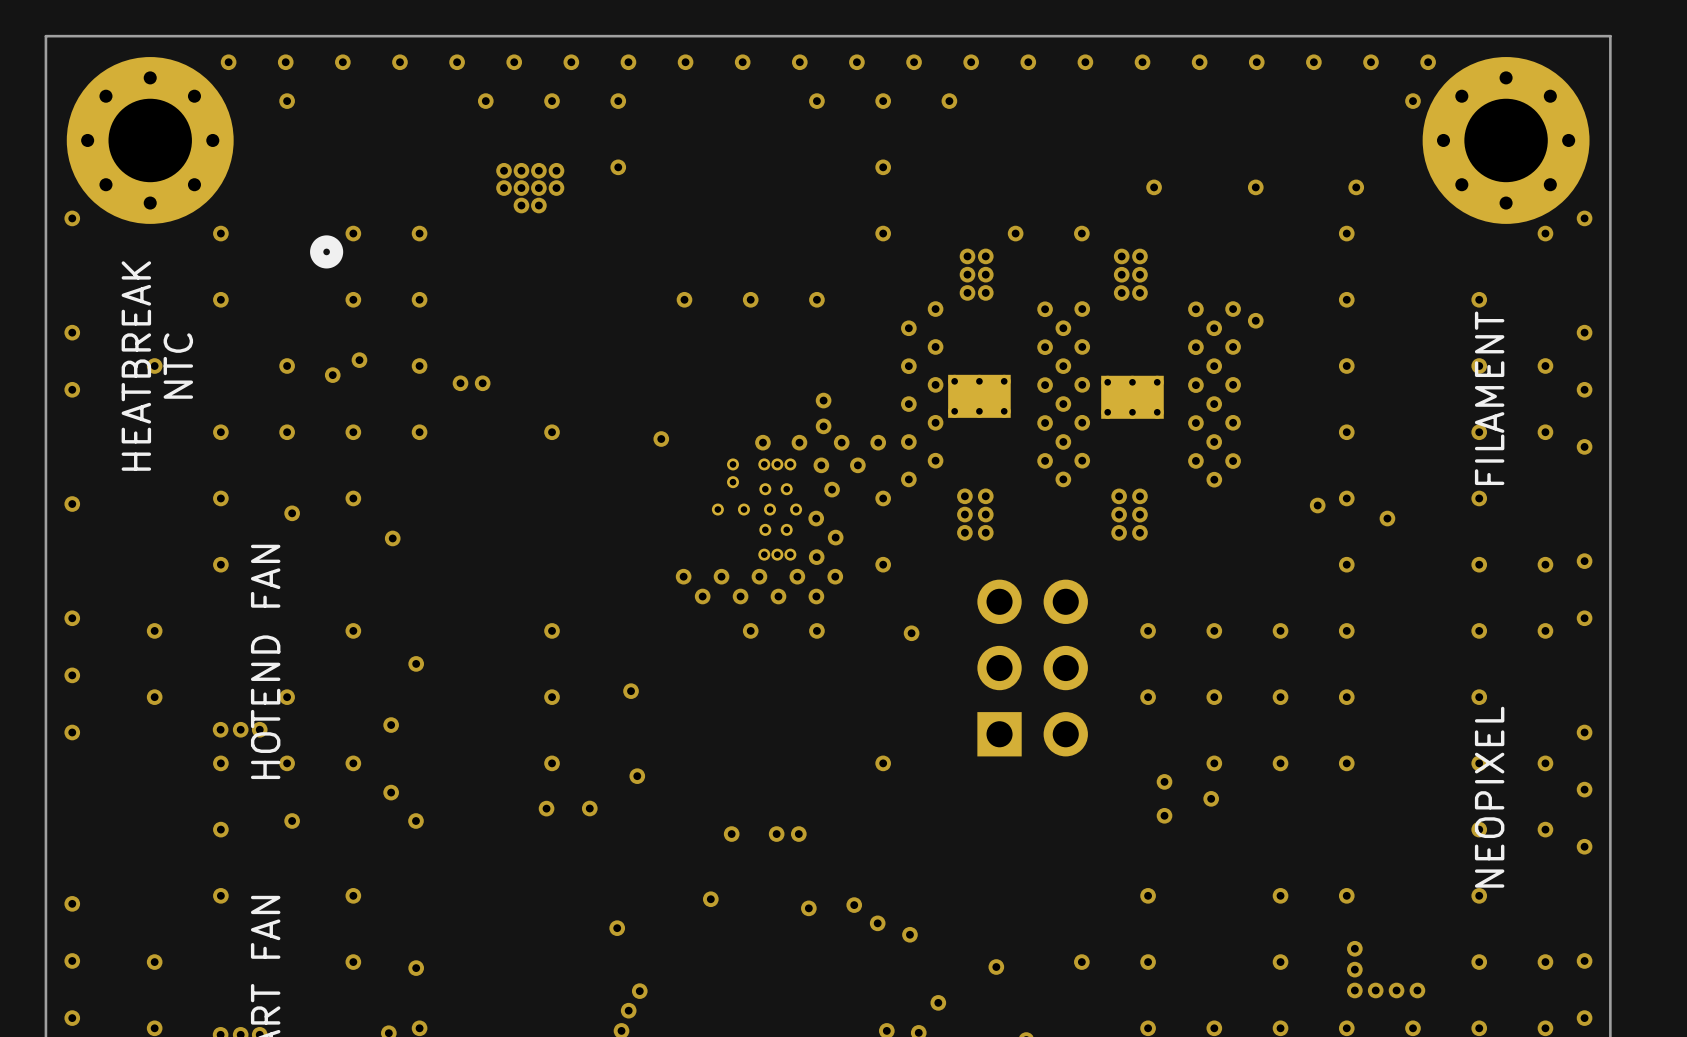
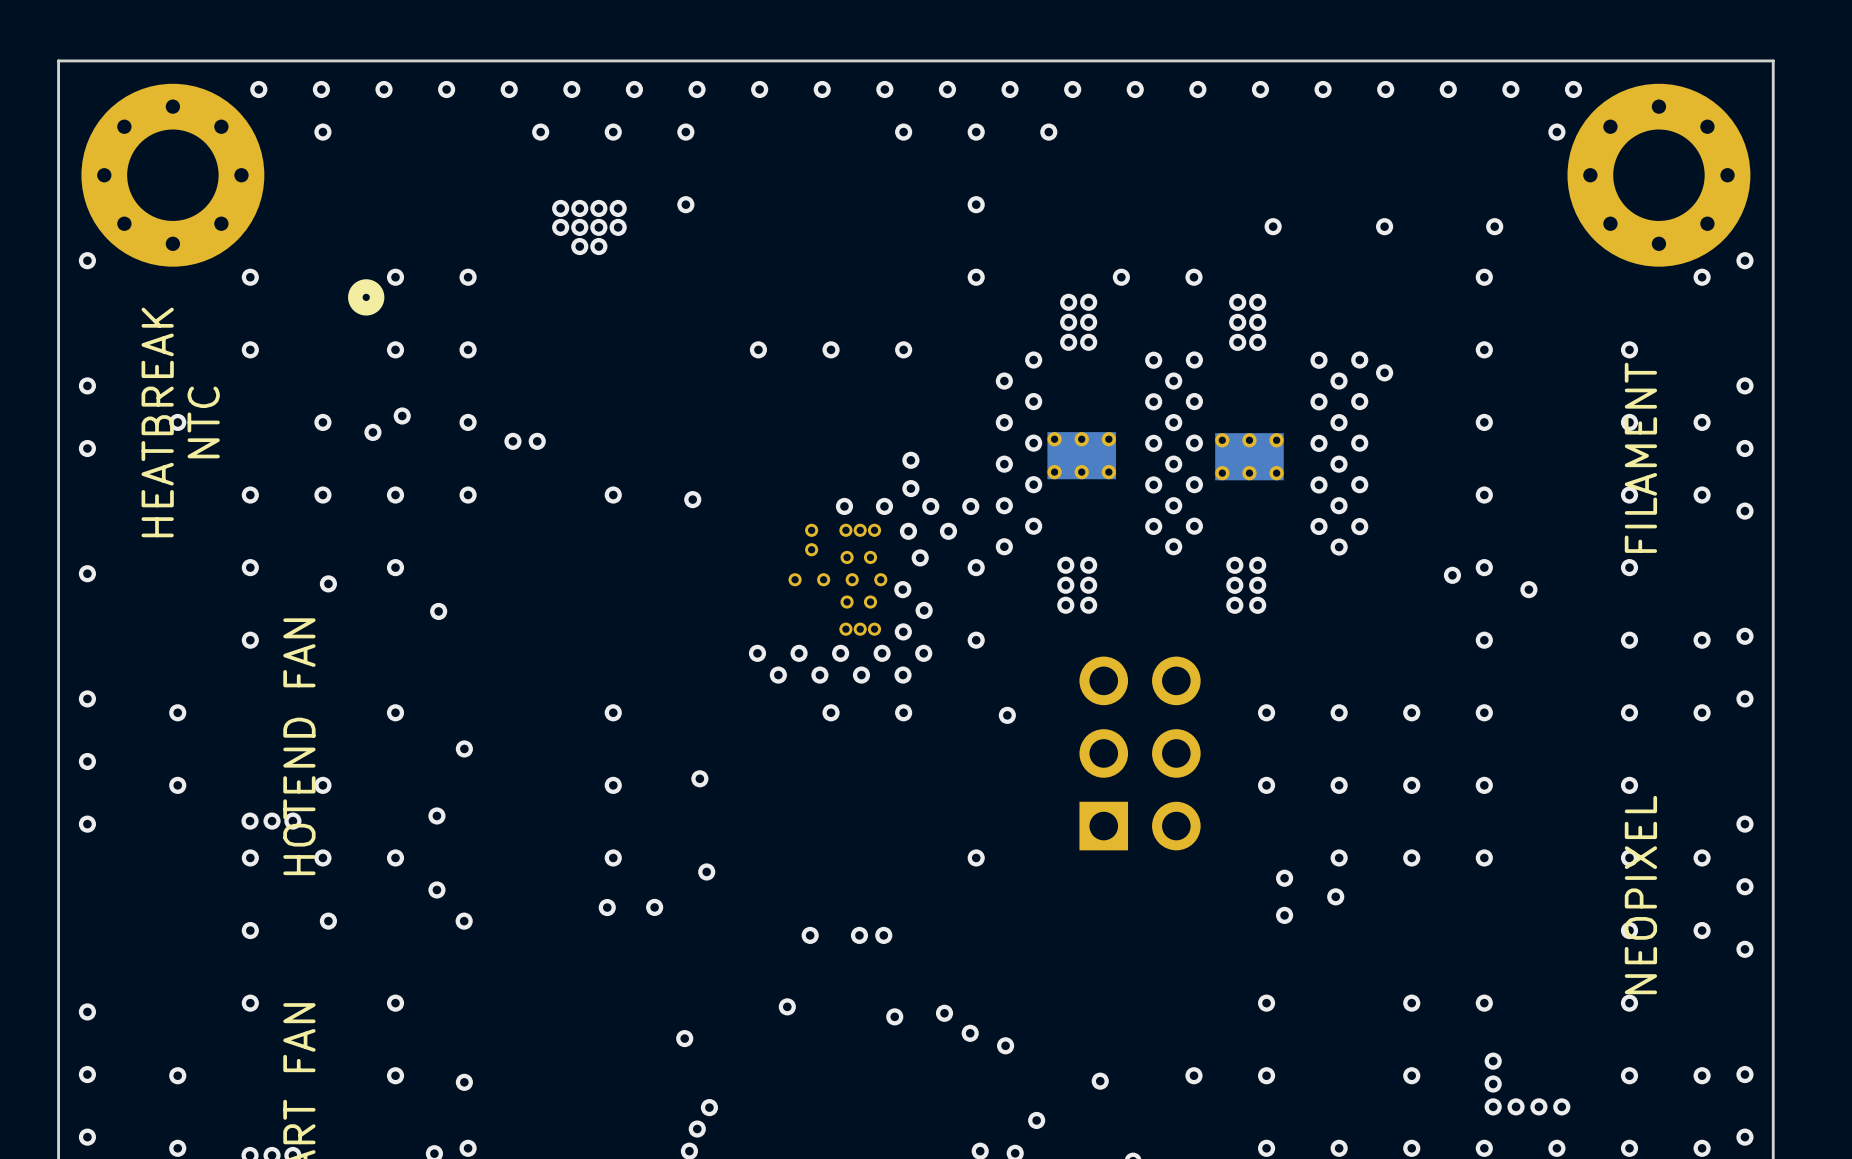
via position: (661, 439) -> (692, 499)

